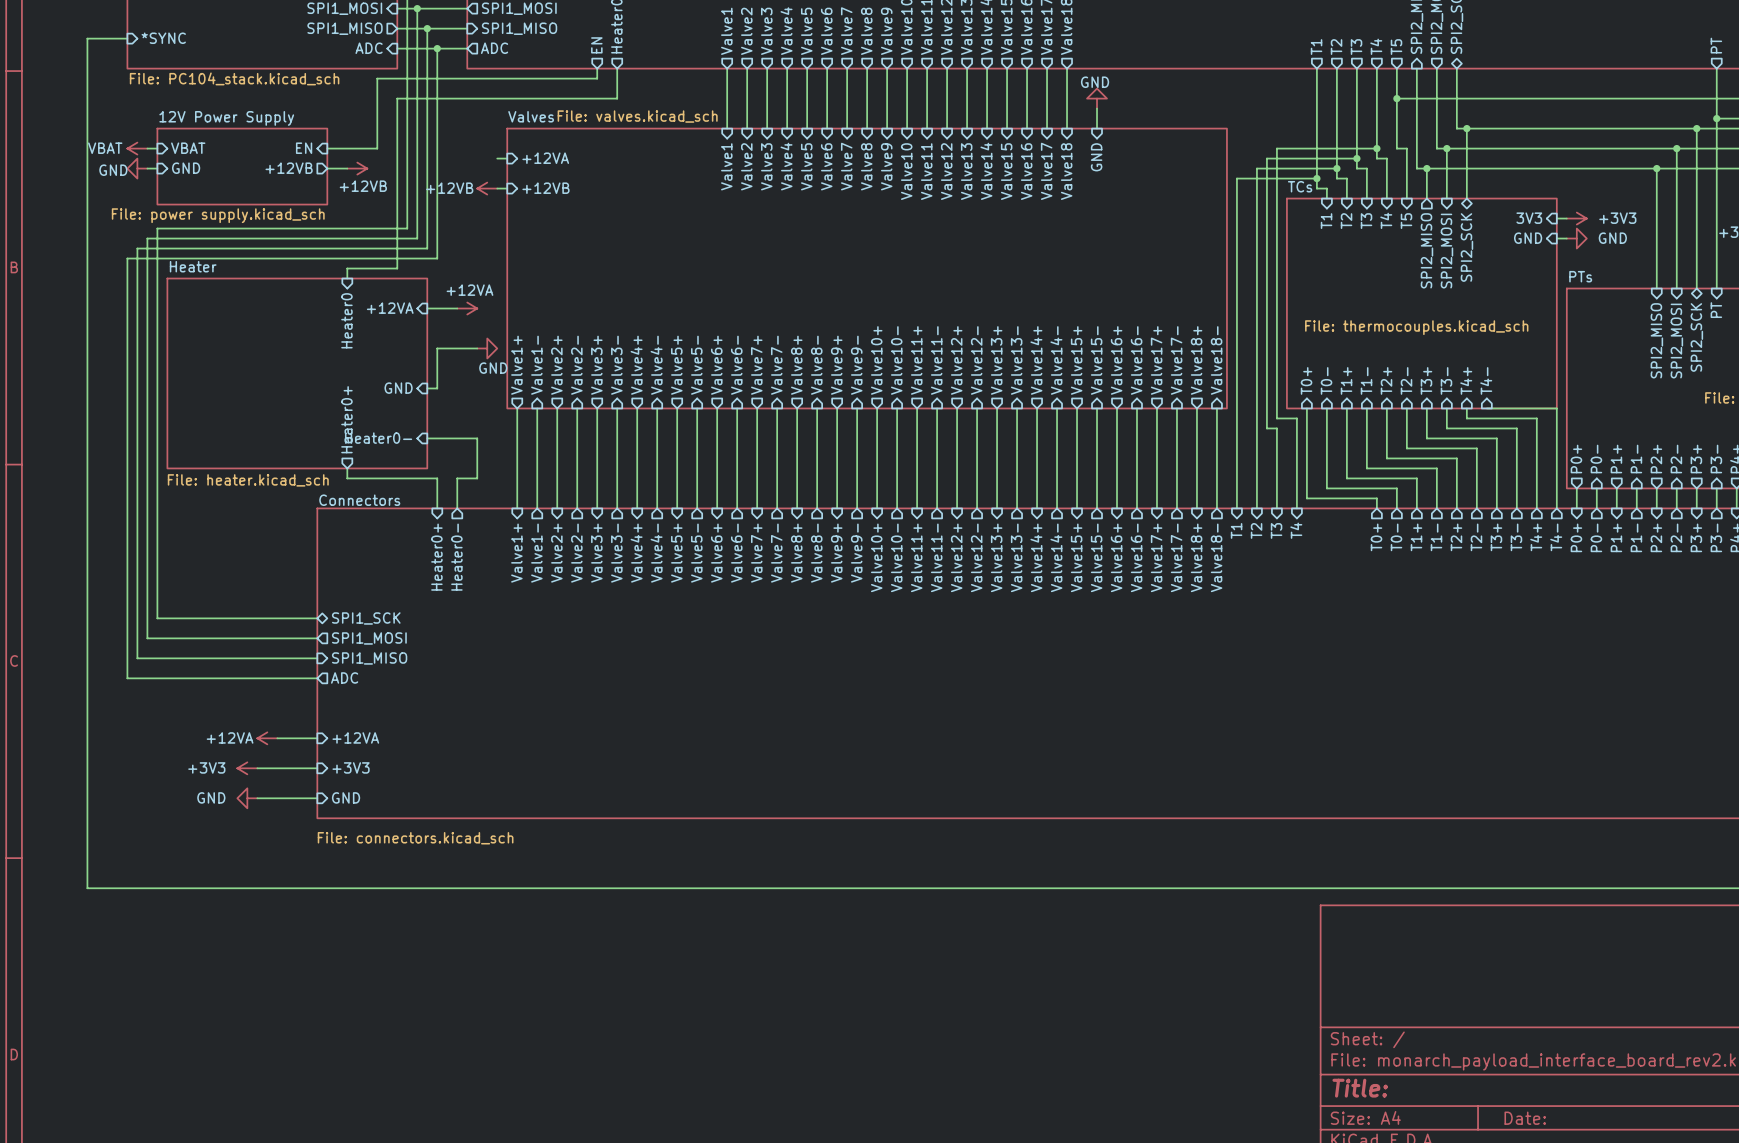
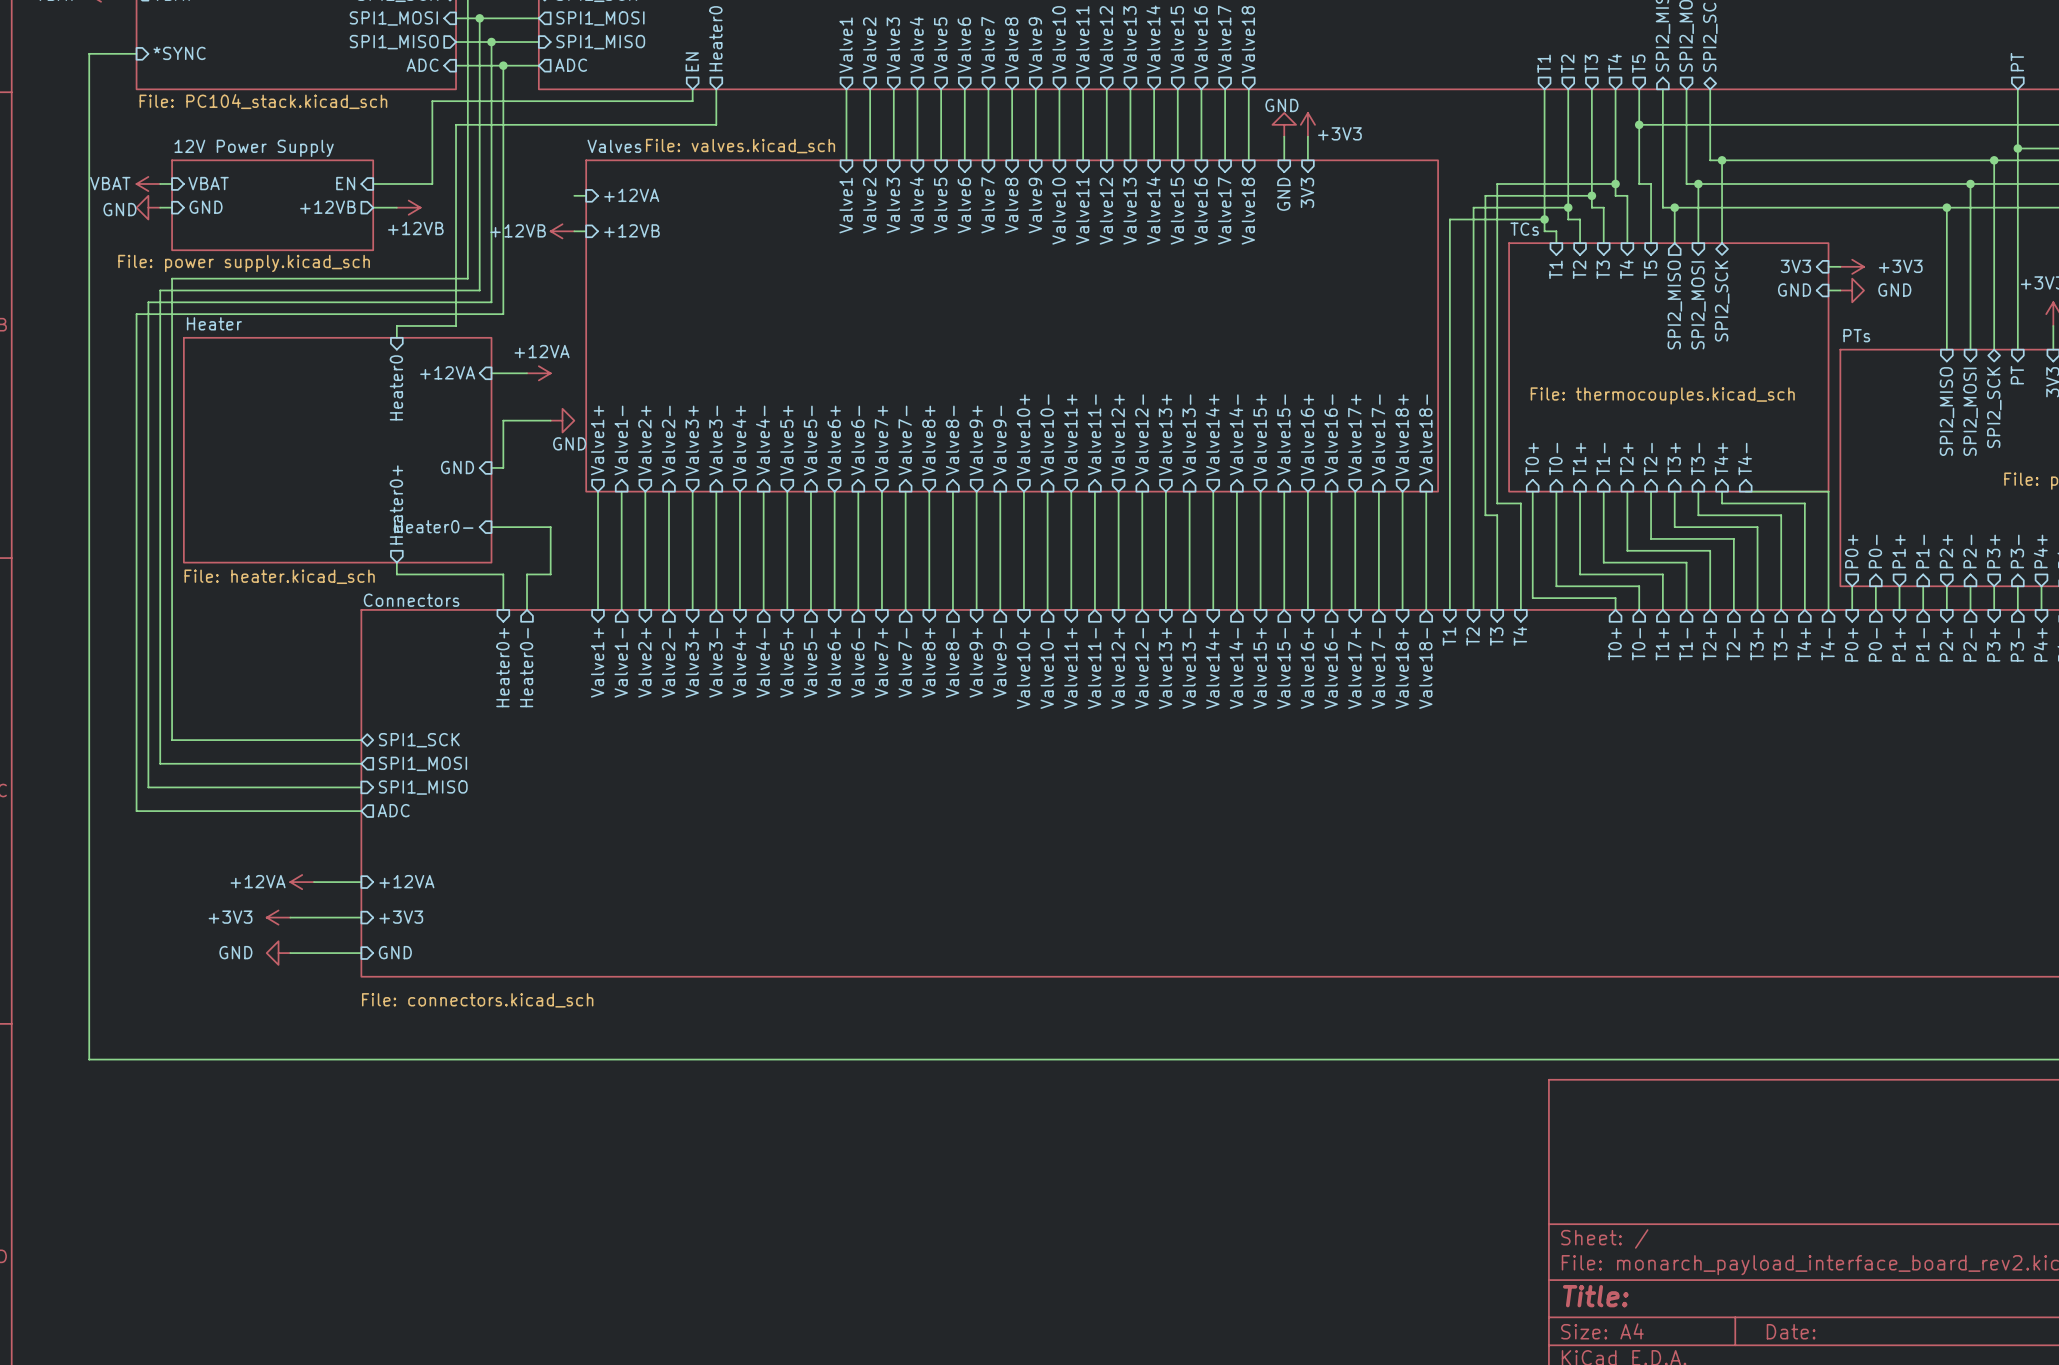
power symbol: none -> +3V3 (1307, 124)
wire: none -> (1307, 136) (1307, 160)
sheet pin: none -> 3V3 (1307, 192)

